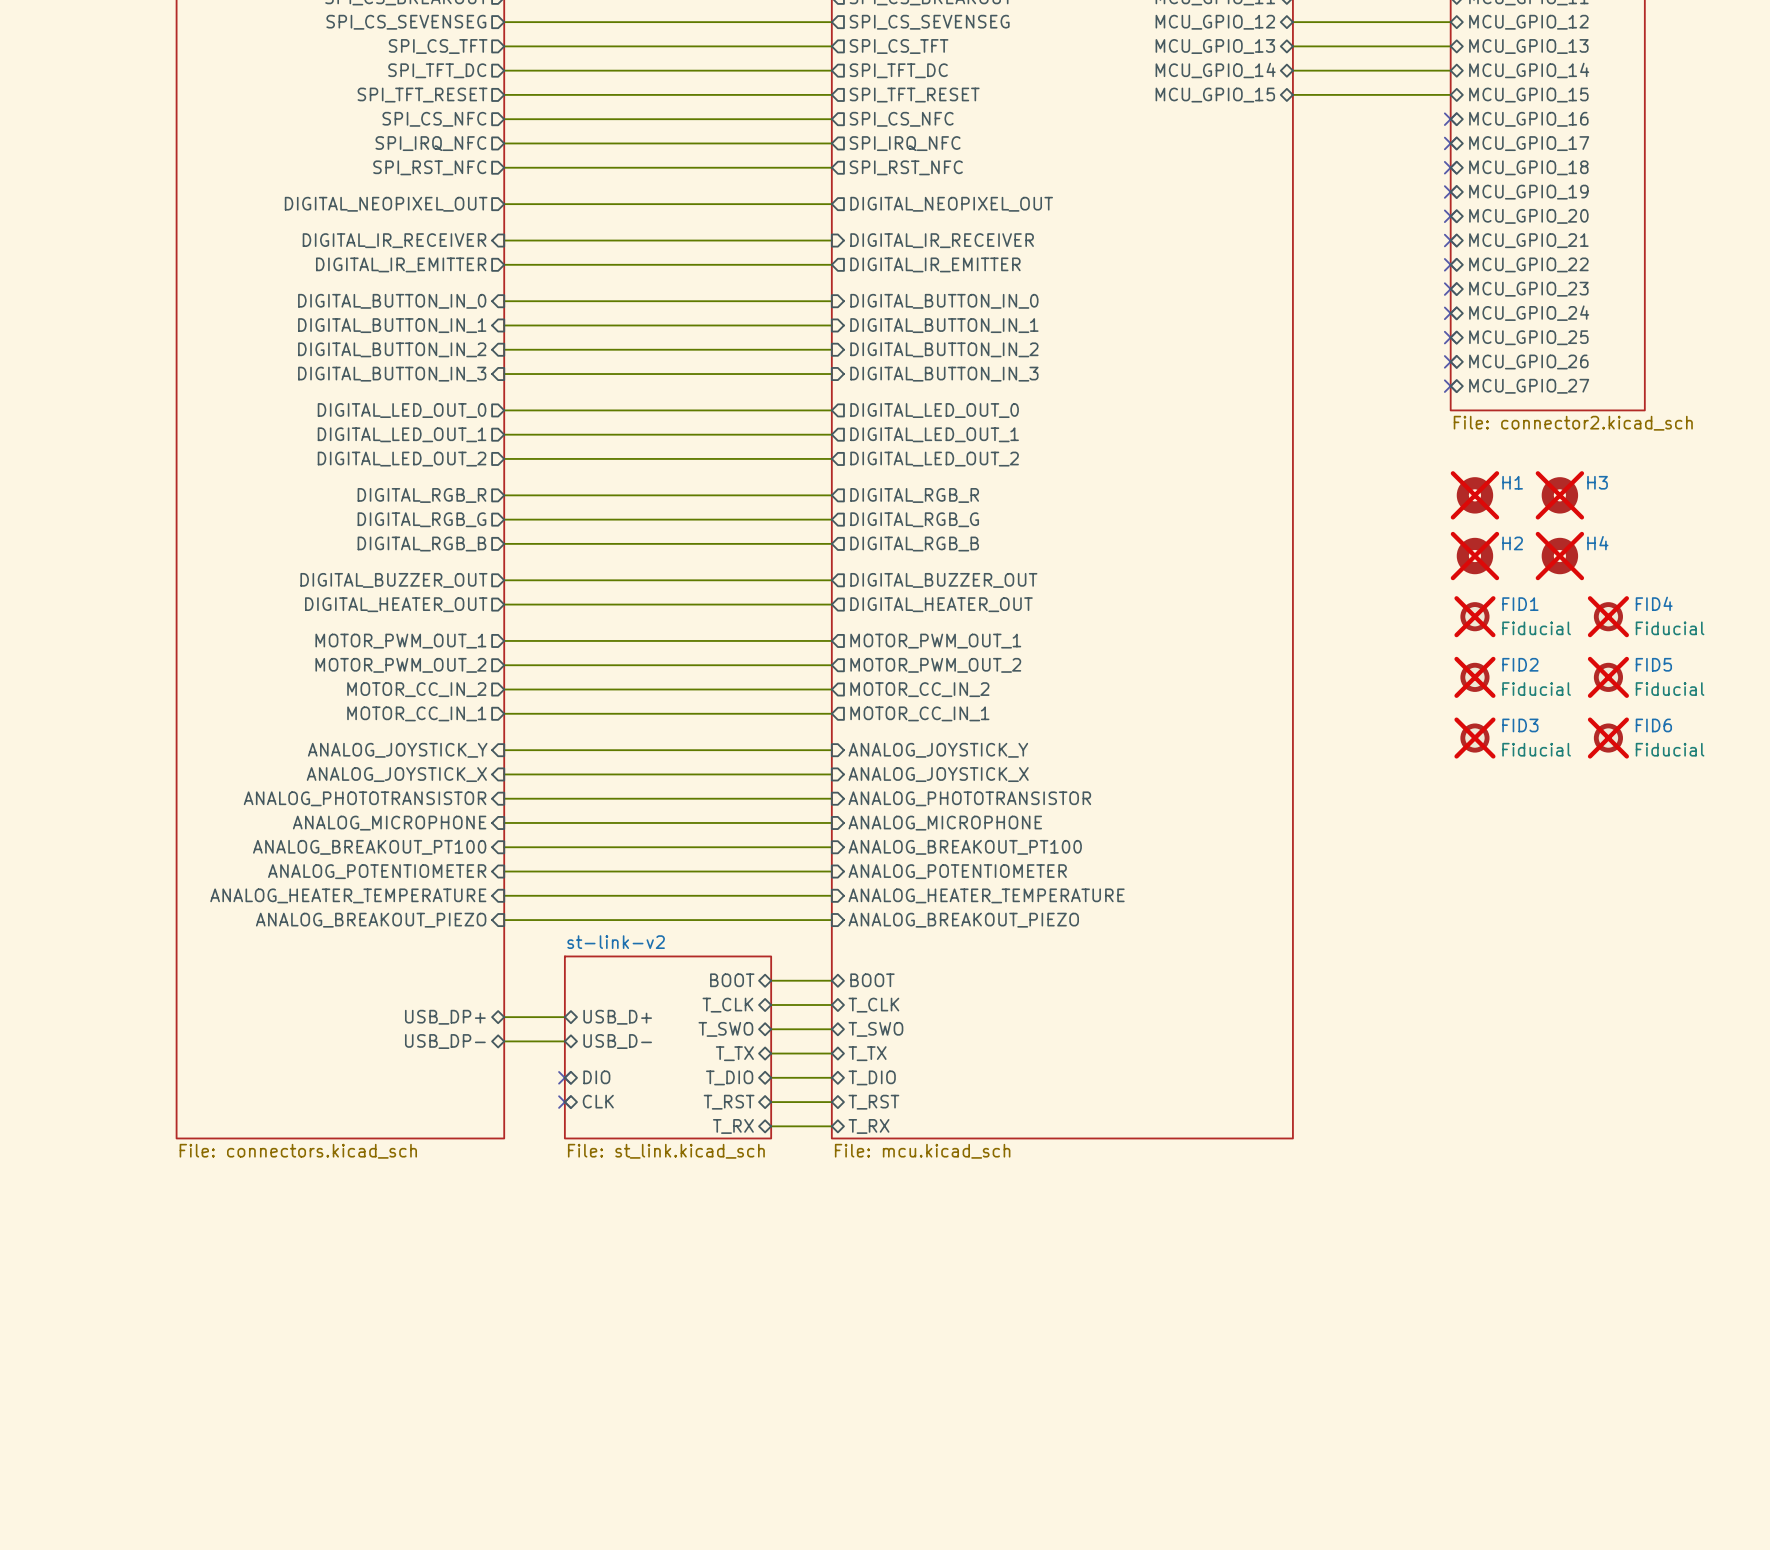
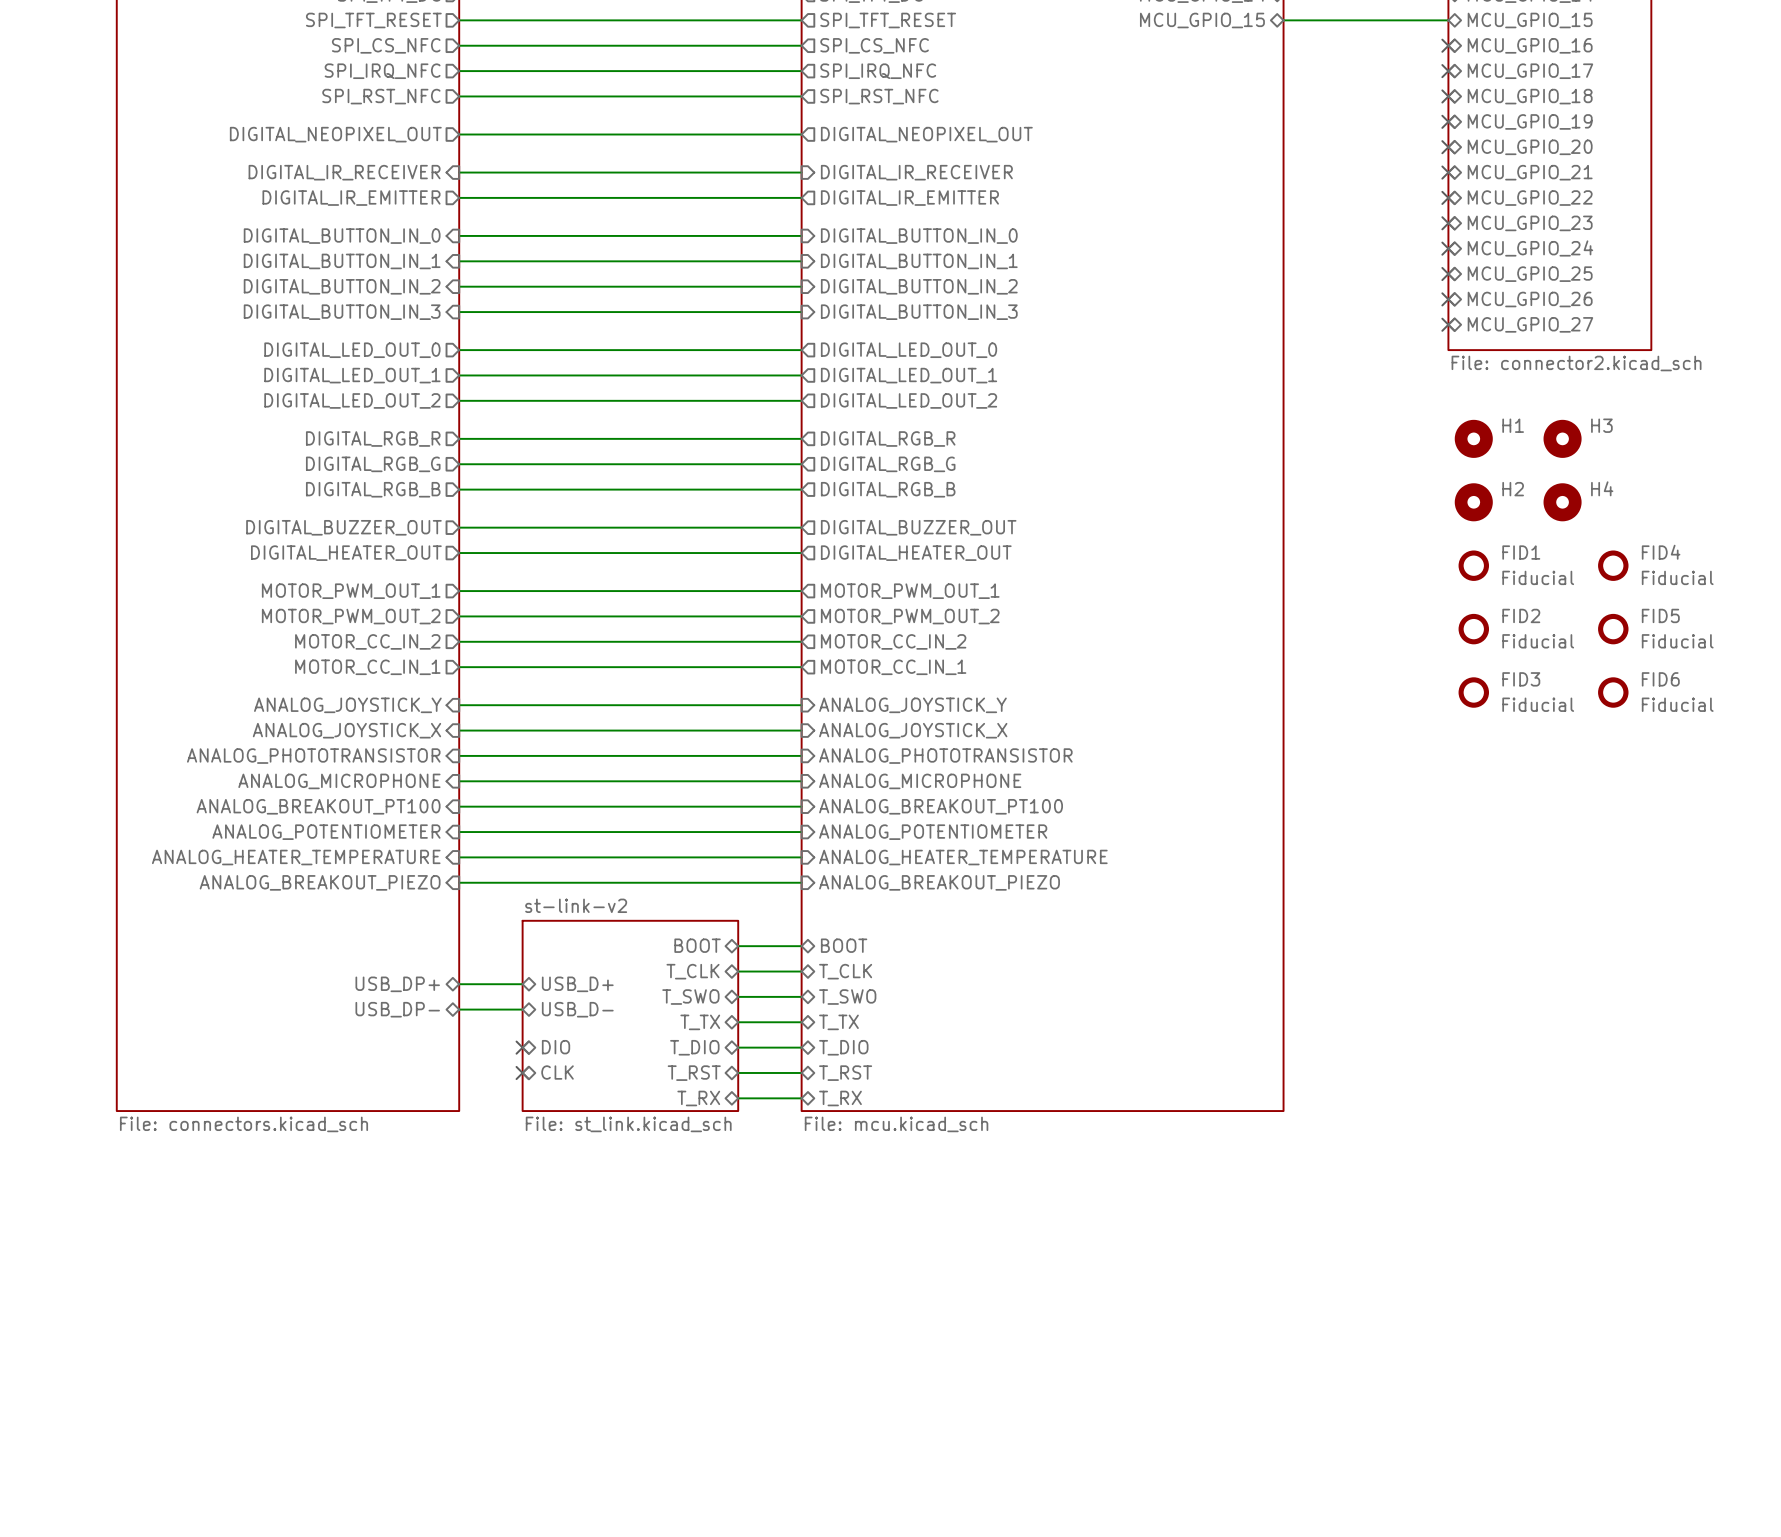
H1 do-not-place cross: (1474, 495) -> none
H3 do-not-place cross: (1559, 495) -> none
H2 do-not-place cross: (1474, 556) -> none
H4 do-not-place cross: (1559, 556) -> none
FID1 do-not-place cross: (1474, 616) -> none
FID4 do-not-place cross: (1608, 616) -> none
FID2 do-not-place cross: (1474, 677) -> none
FID5 do-not-place cross: (1608, 677) -> none
FID3 do-not-place cross: (1474, 738) -> none
FID6 do-not-place cross: (1608, 738) -> none

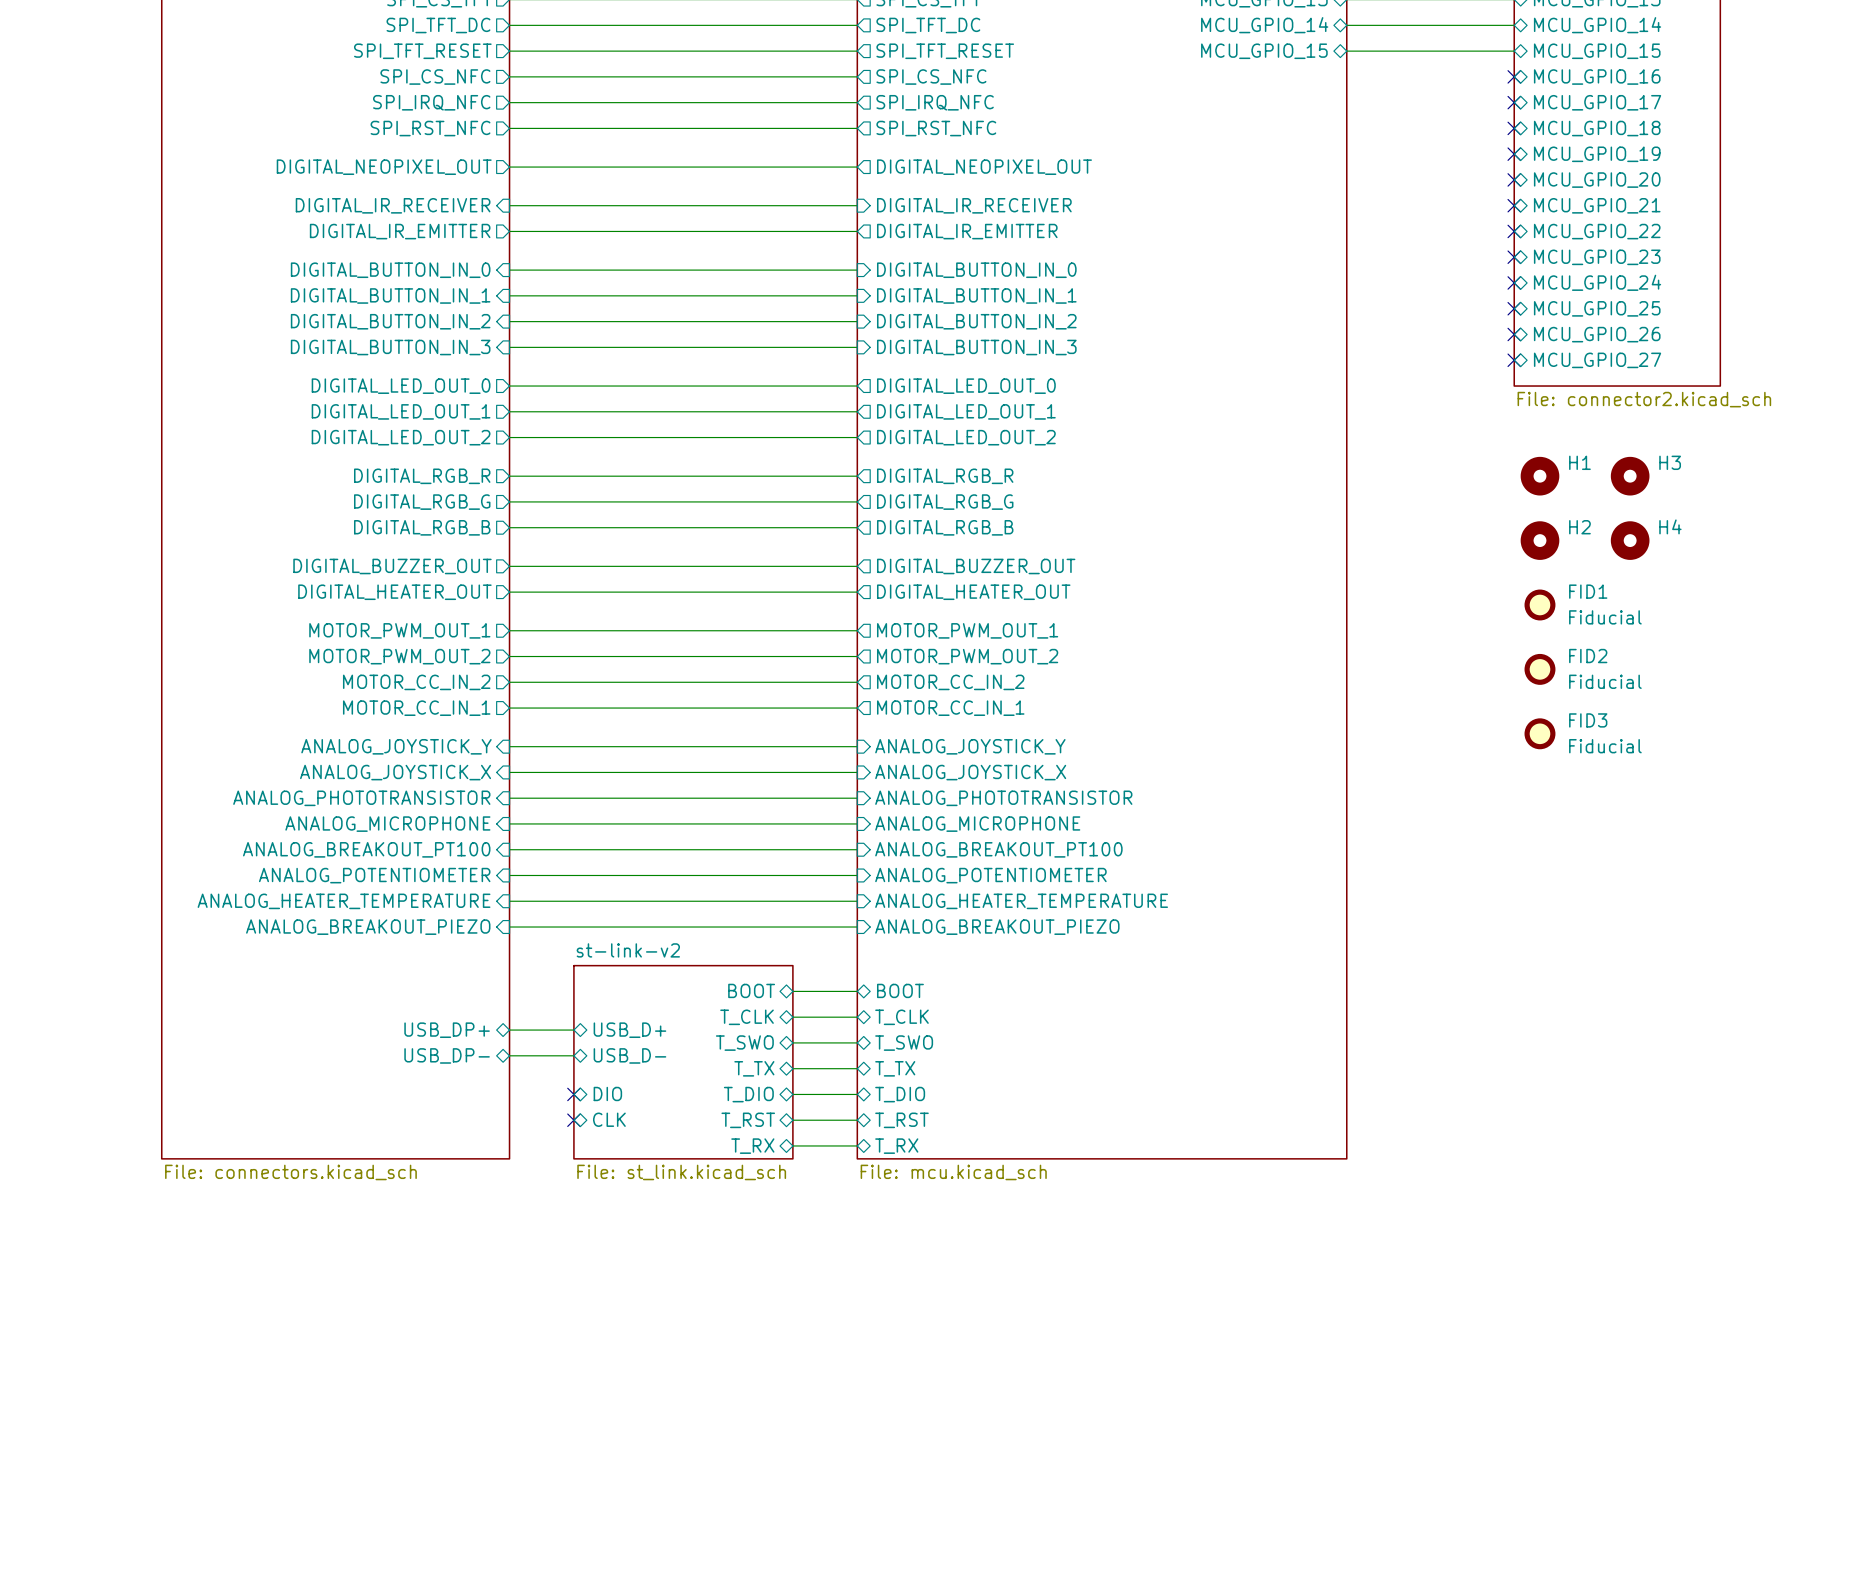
FID4: Fiducial (1613, 565) -> none
FID5: Fiducial (1613, 629) -> none
FID6: Fiducial (1613, 692) -> none

